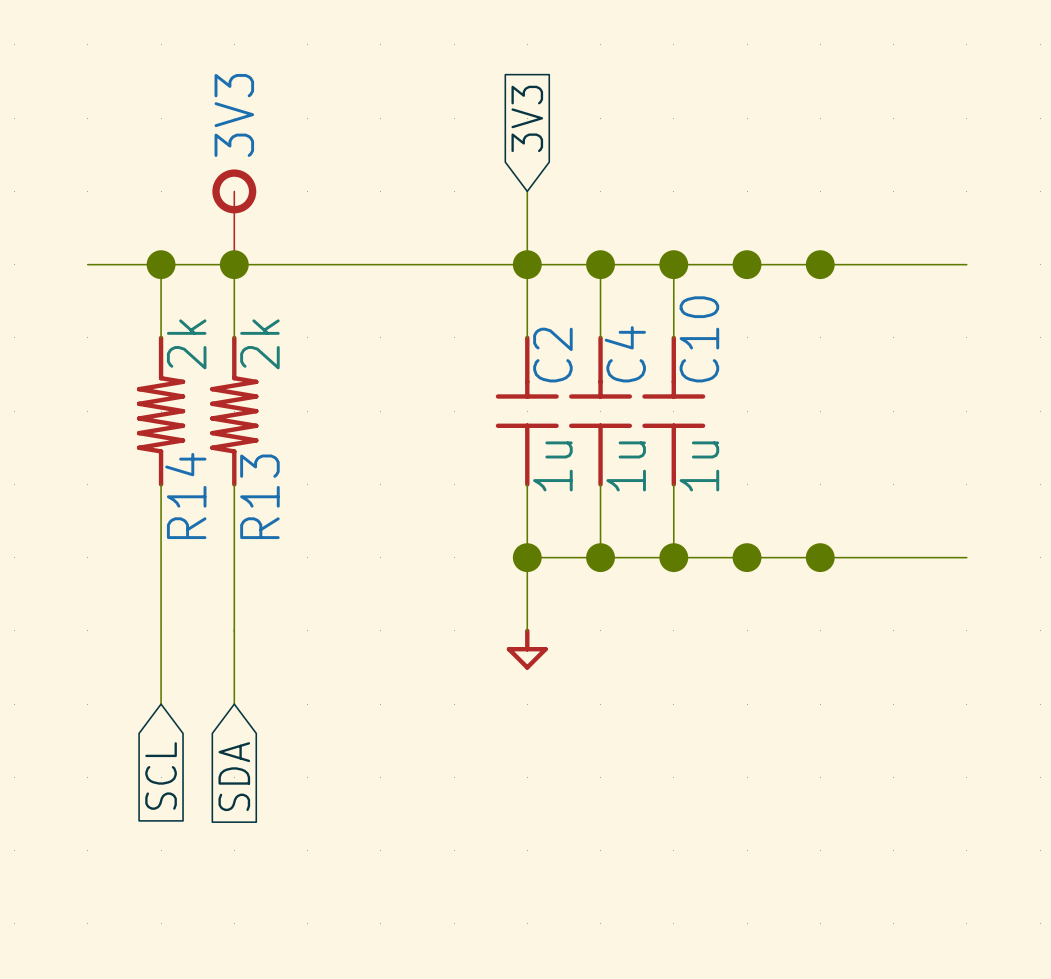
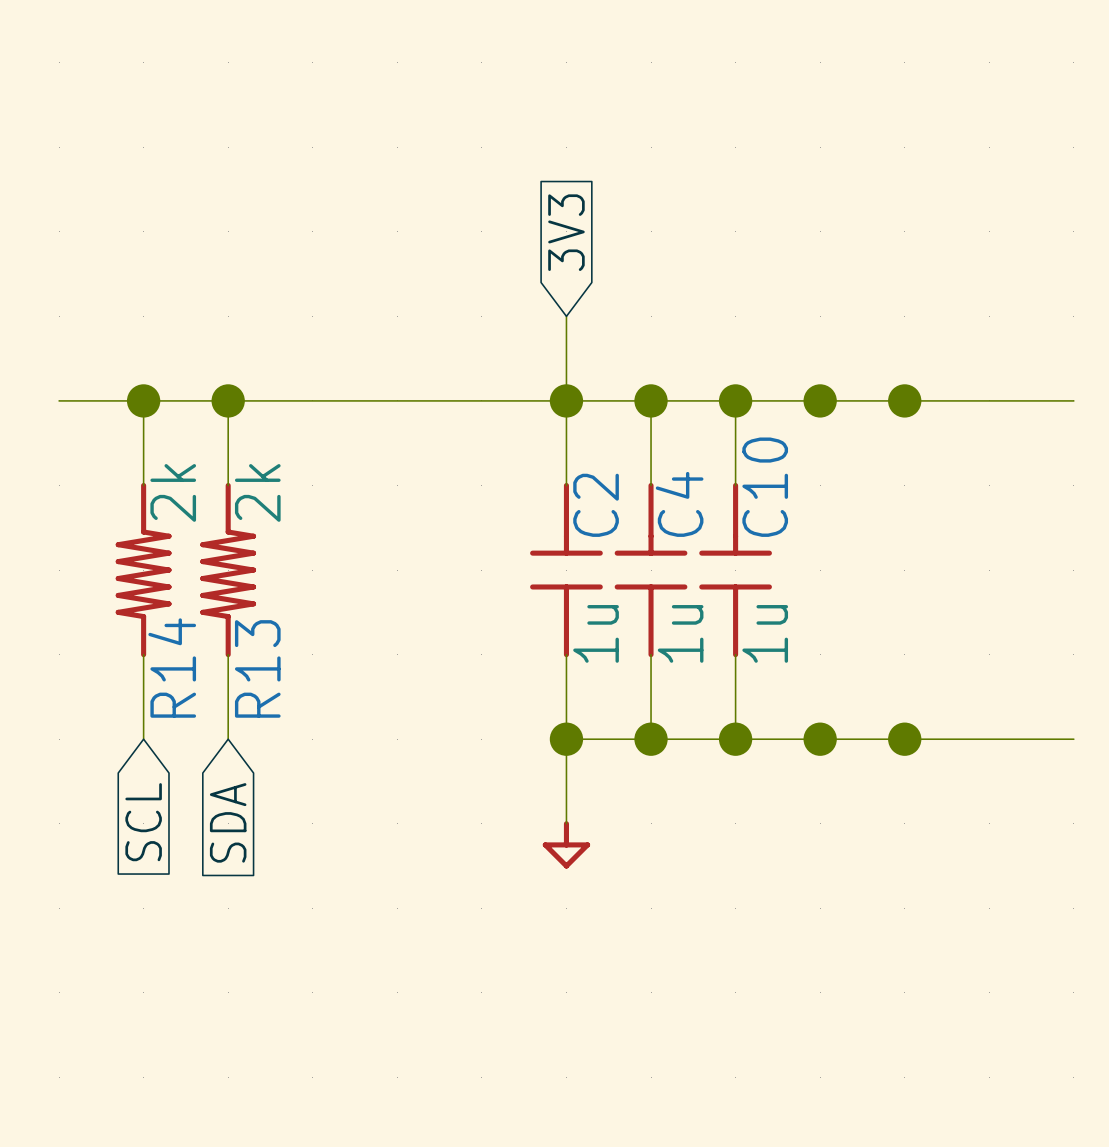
3V3: (234, 217) -> none
wire: (161, 557) (161, 704) -> none
wire: (234, 557) (234, 704) -> none
global label position: SCL (161, 775) -> SCL (143, 822)
global label position: SDA (234, 776) -> SDA (228, 822)

